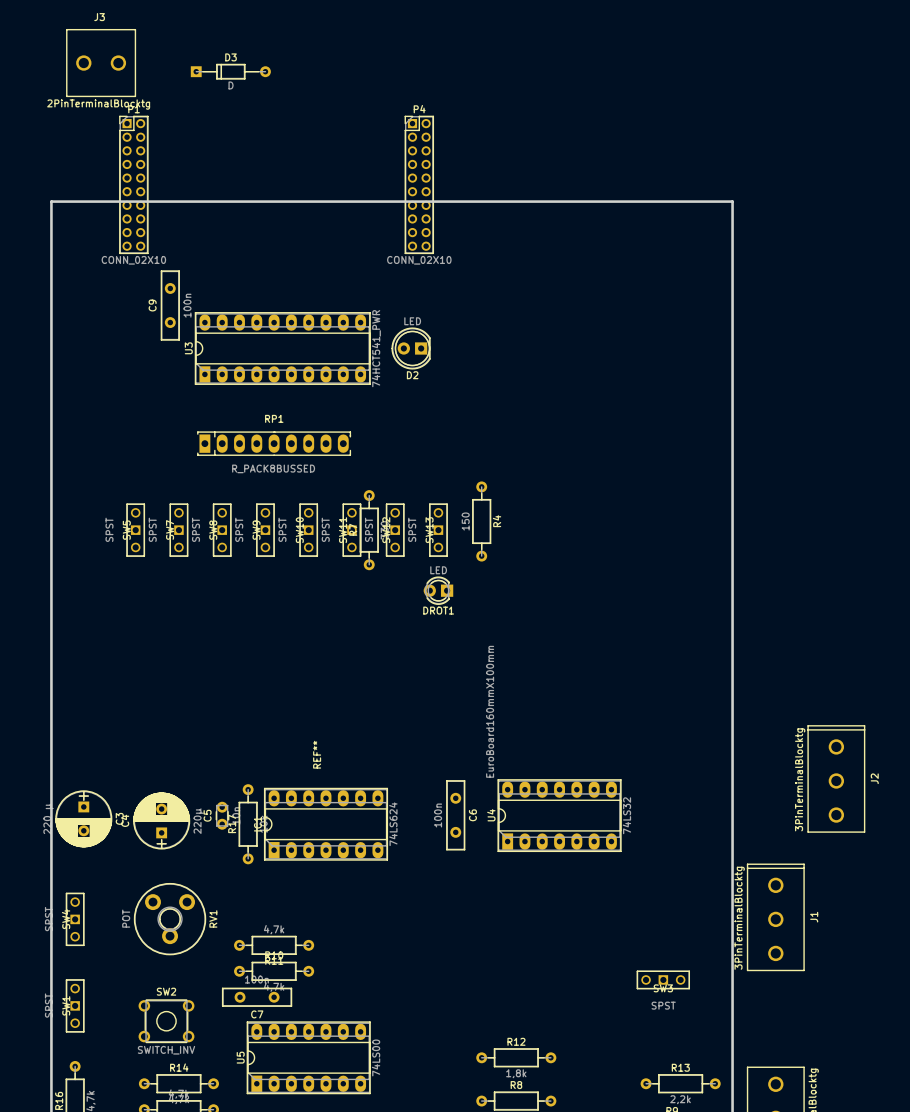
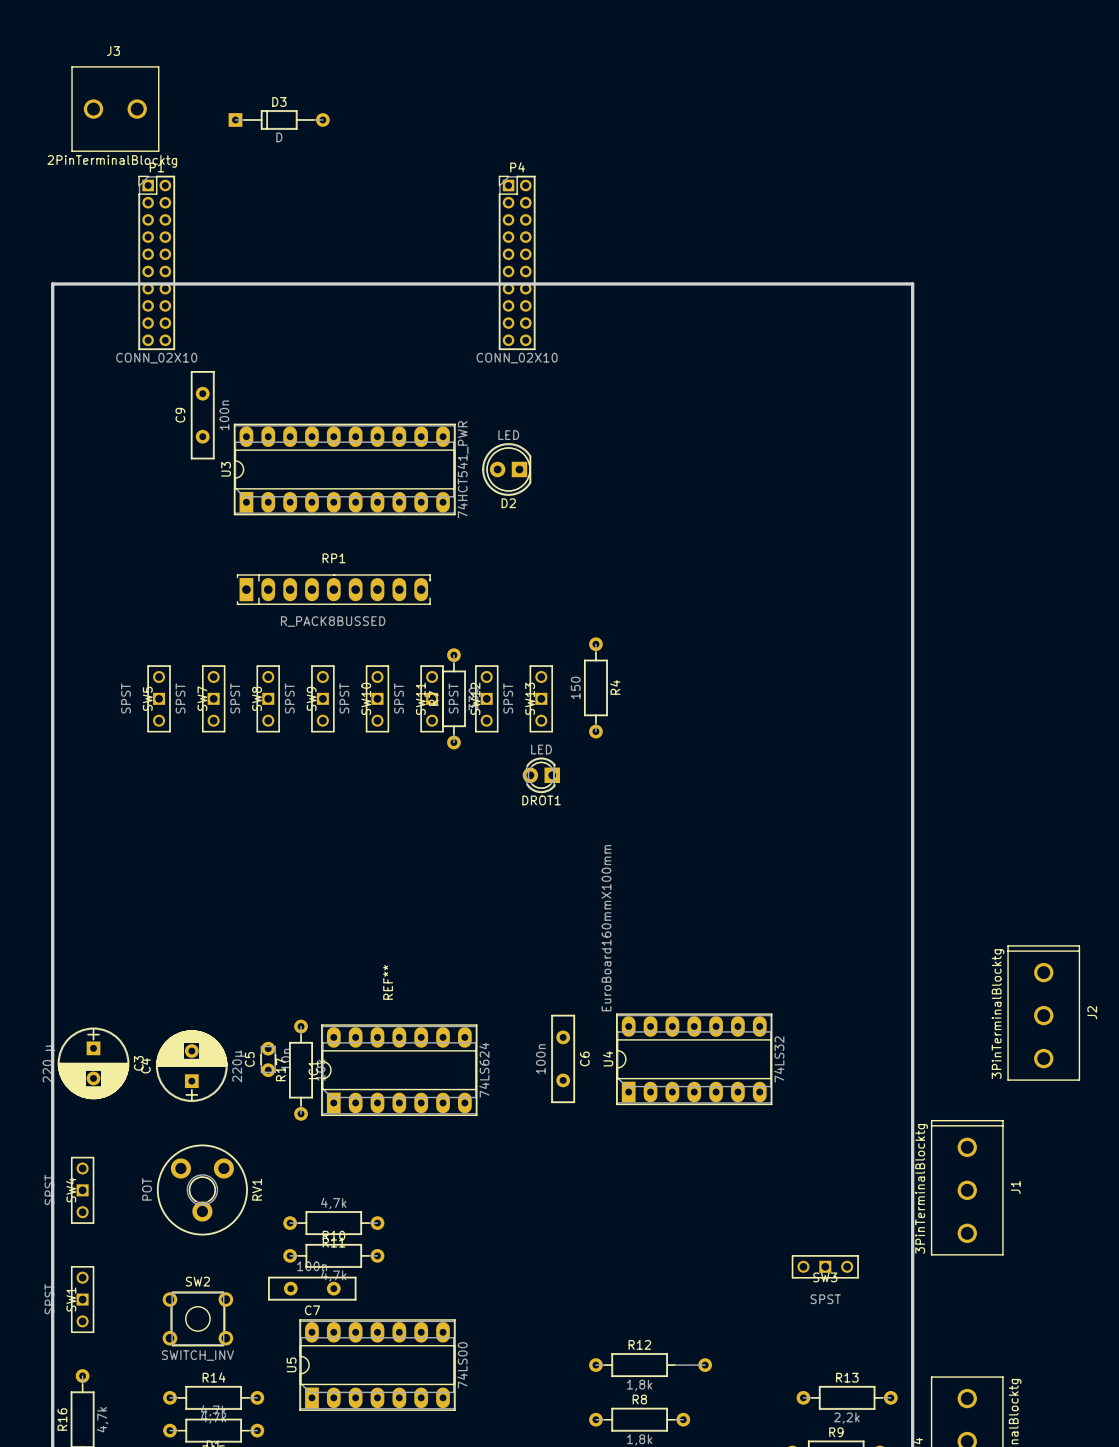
R12 footprint: [476, 1048, 557, 1068] -> [589, 1353, 713, 1377]

